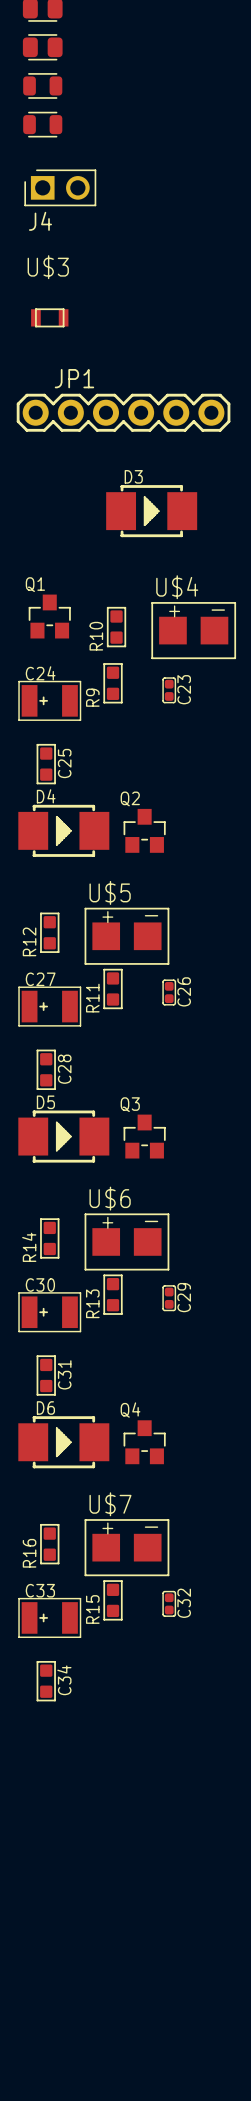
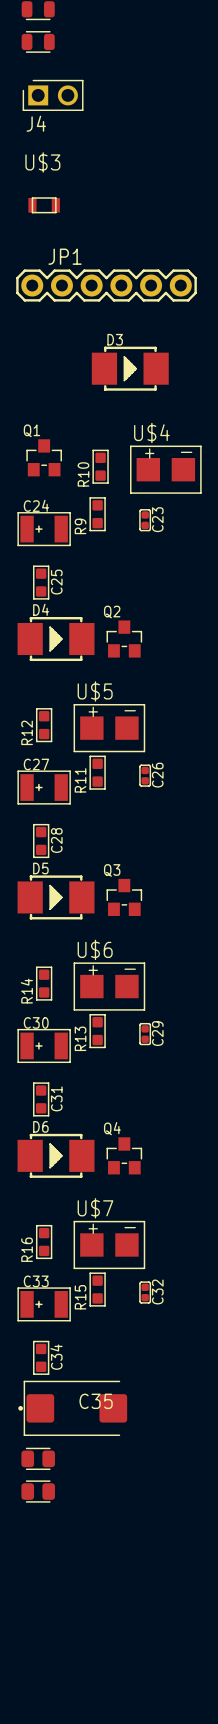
C35: none -> (72, 1408)
part: none -> (38, 1458)
part: none -> (38, 1491)

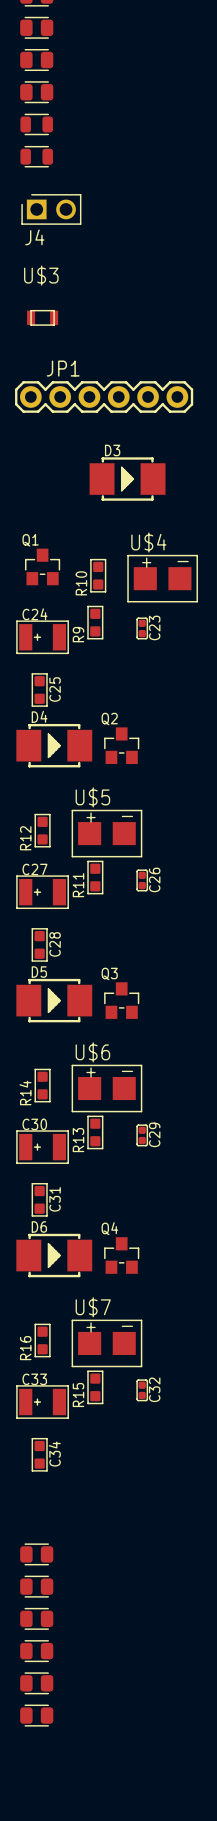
C35: (72, 1408) -> none
part: none -> (36, 1618)
part: none -> (36, 1651)
part: none -> (36, 1683)
part: none -> (36, 1715)

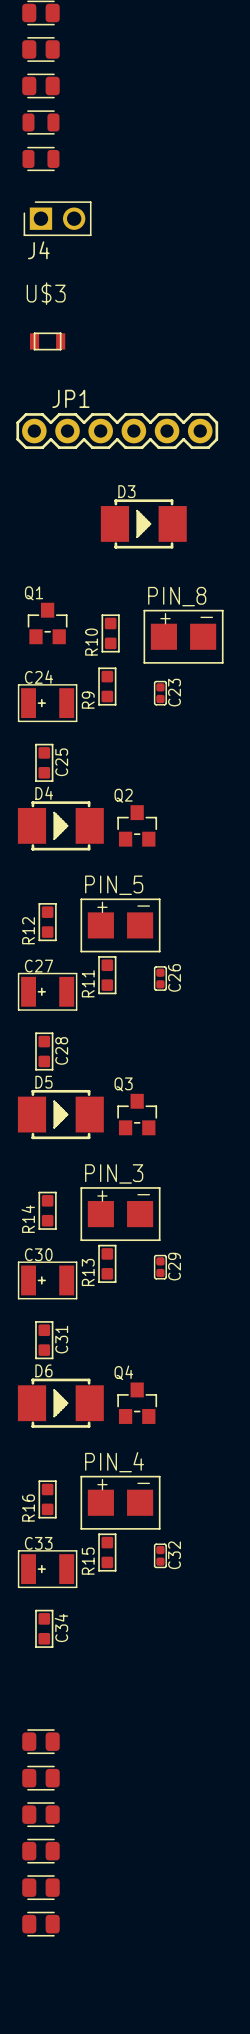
U$4 name: U$4 (148, 542) -> PIN_8 (177, 596)
U$5 name: U$5 (92, 797) -> PIN_5 (114, 885)
U$6 name: U$6 (92, 1052) -> PIN_3 (114, 1173)
U$7 name: U$7 (93, 1307) -> PIN_4 (114, 1462)

